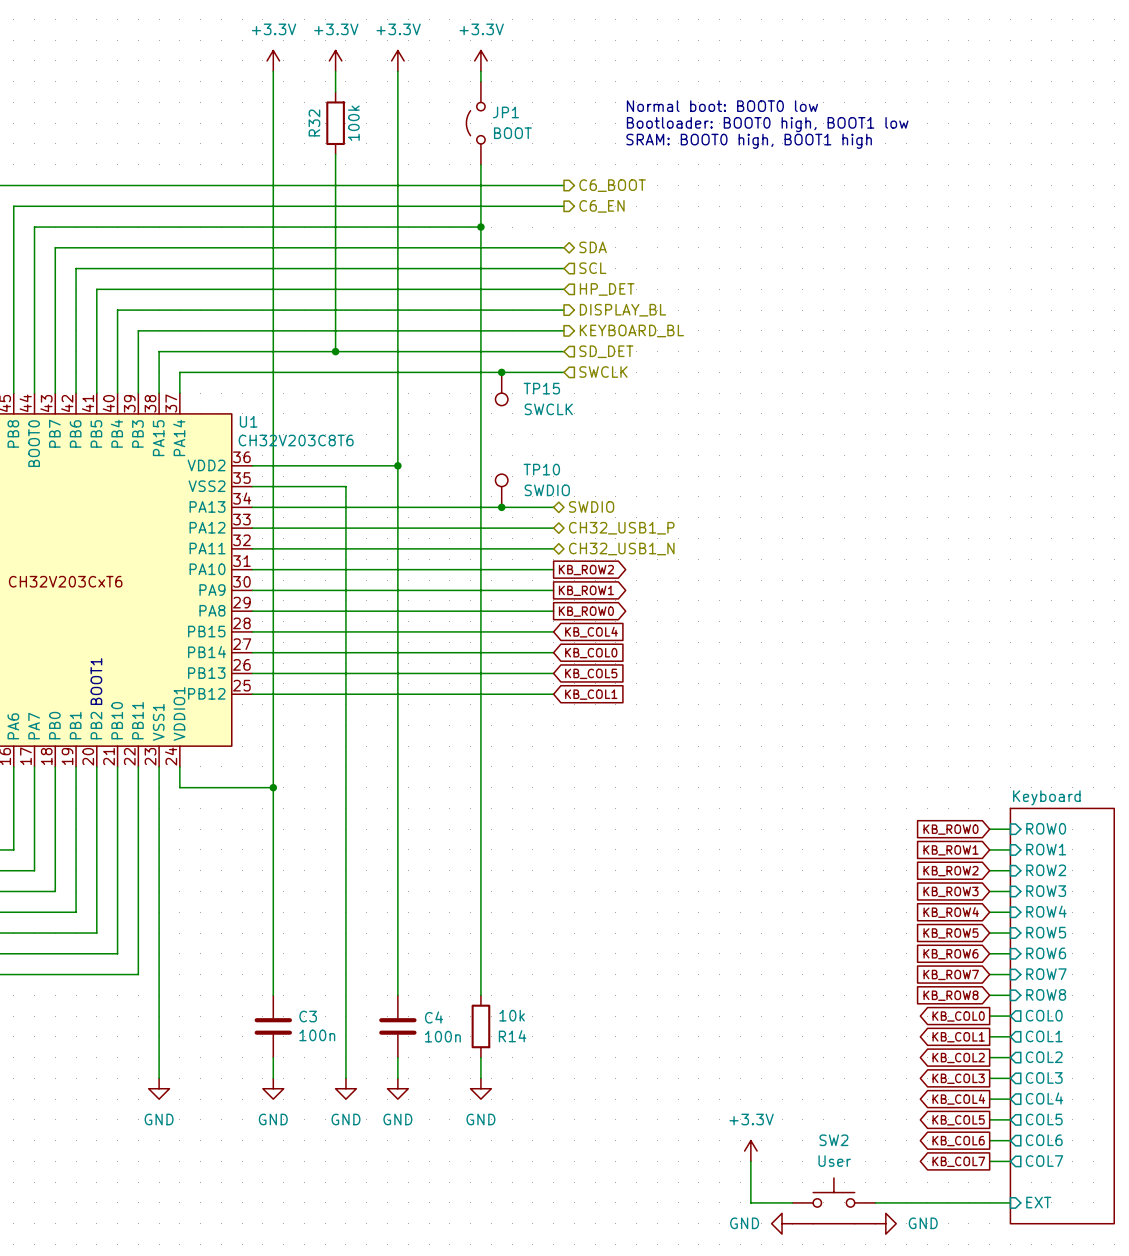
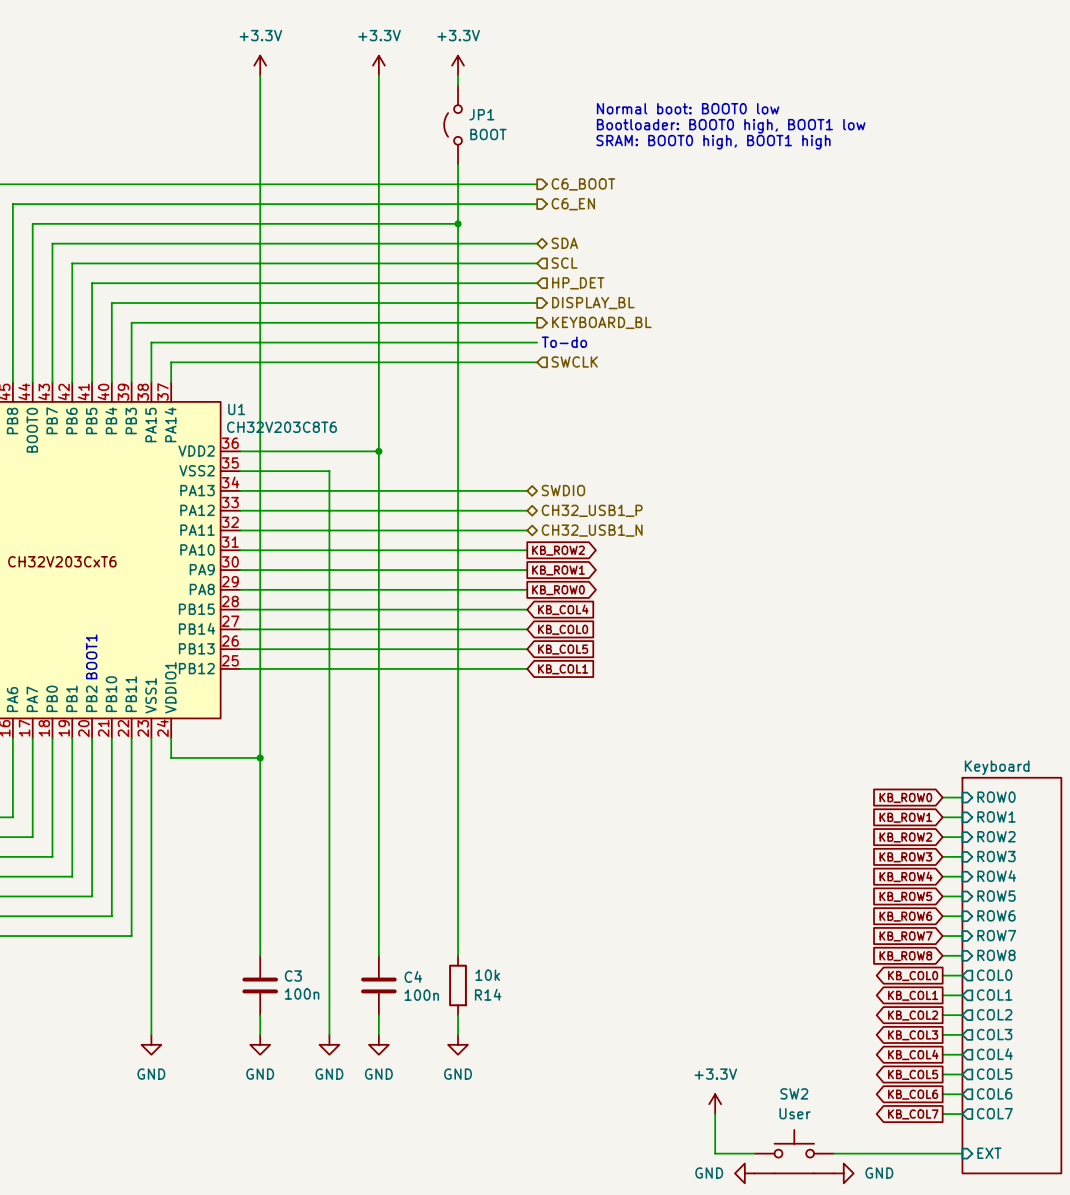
power symbol: +3.3V (335, 60) -> none
wire: (335, 71) (335, 92) -> none
R32: 100k (335, 123) -> none
wire: (335, 154) (335, 351) -> none
junction: (335, 351) -> none
text: none -> To-do (564, 342)
hierarchical label: SD_DET (606, 351) -> none
junction: (501, 372) -> none
TP15: SWCLK (501, 389) -> none
TP10: SWDIO (501, 490) -> none
junction: (501, 507) -> none

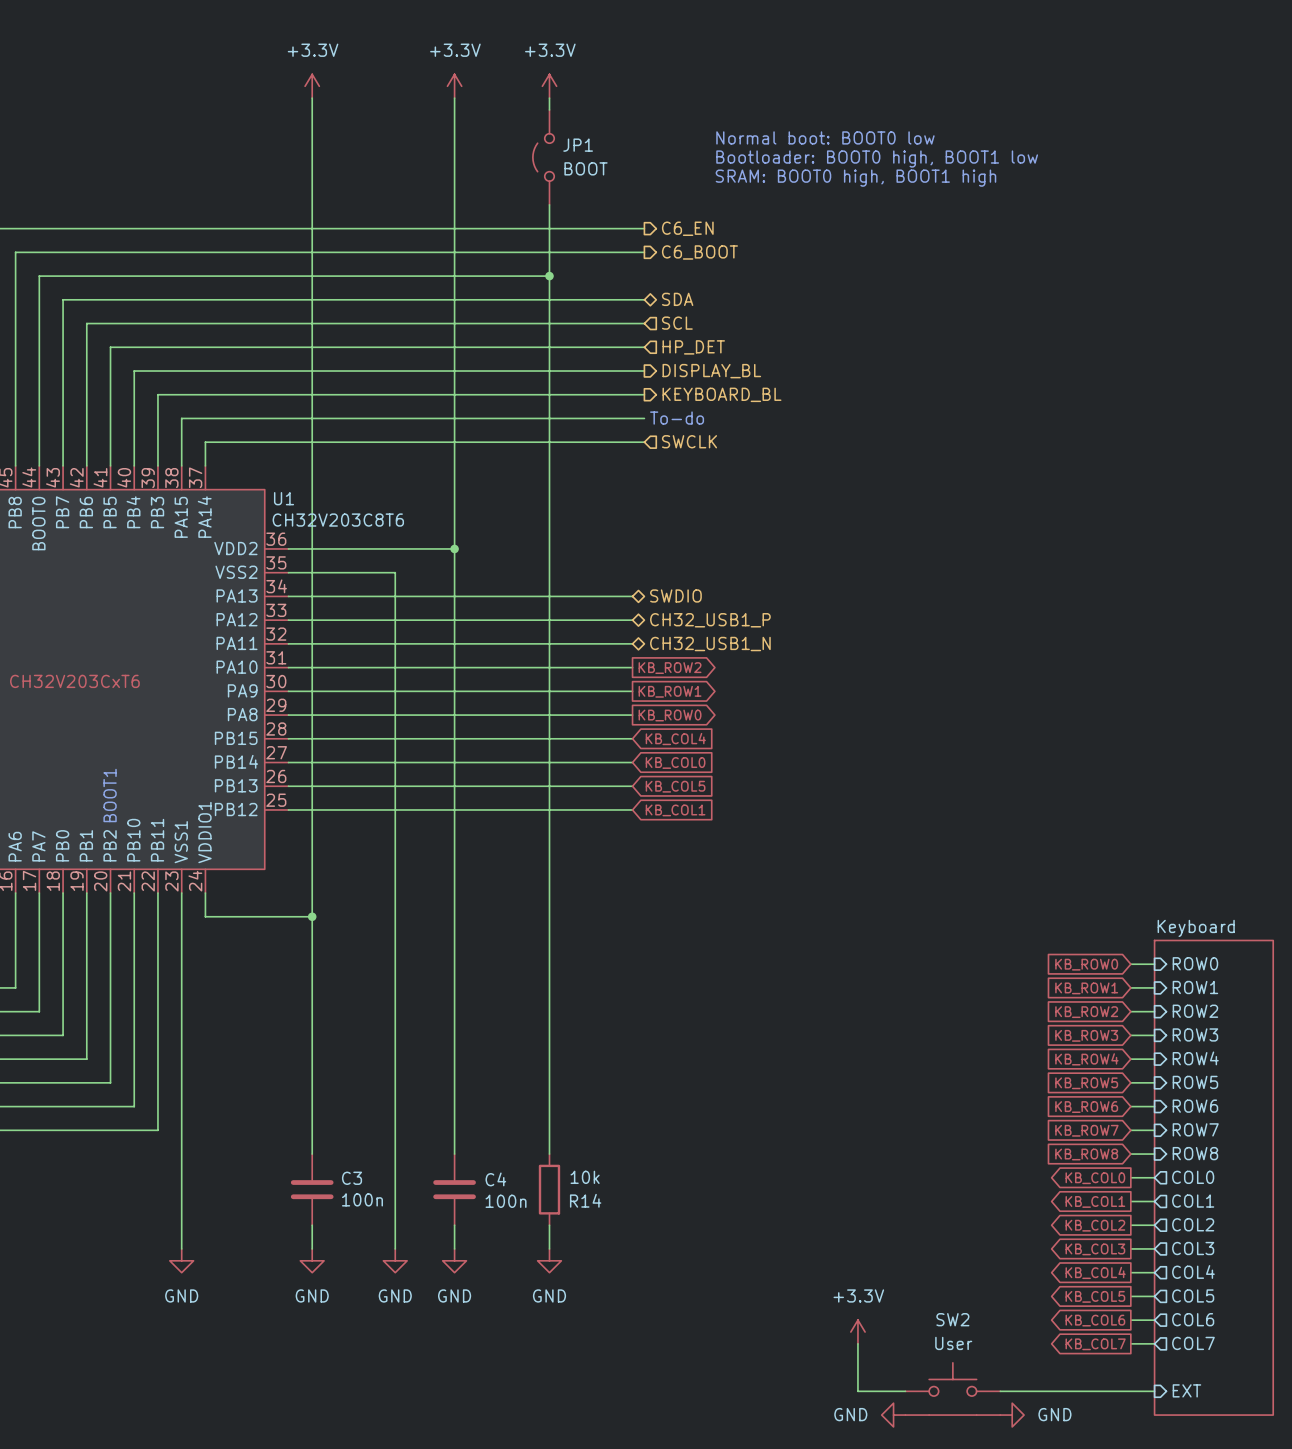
hierarchical label: C6_BOOT (583, 184) -> C6_EN (687, 228)
hierarchical label: C6_EN (573, 204) -> C6_BOOT (699, 252)

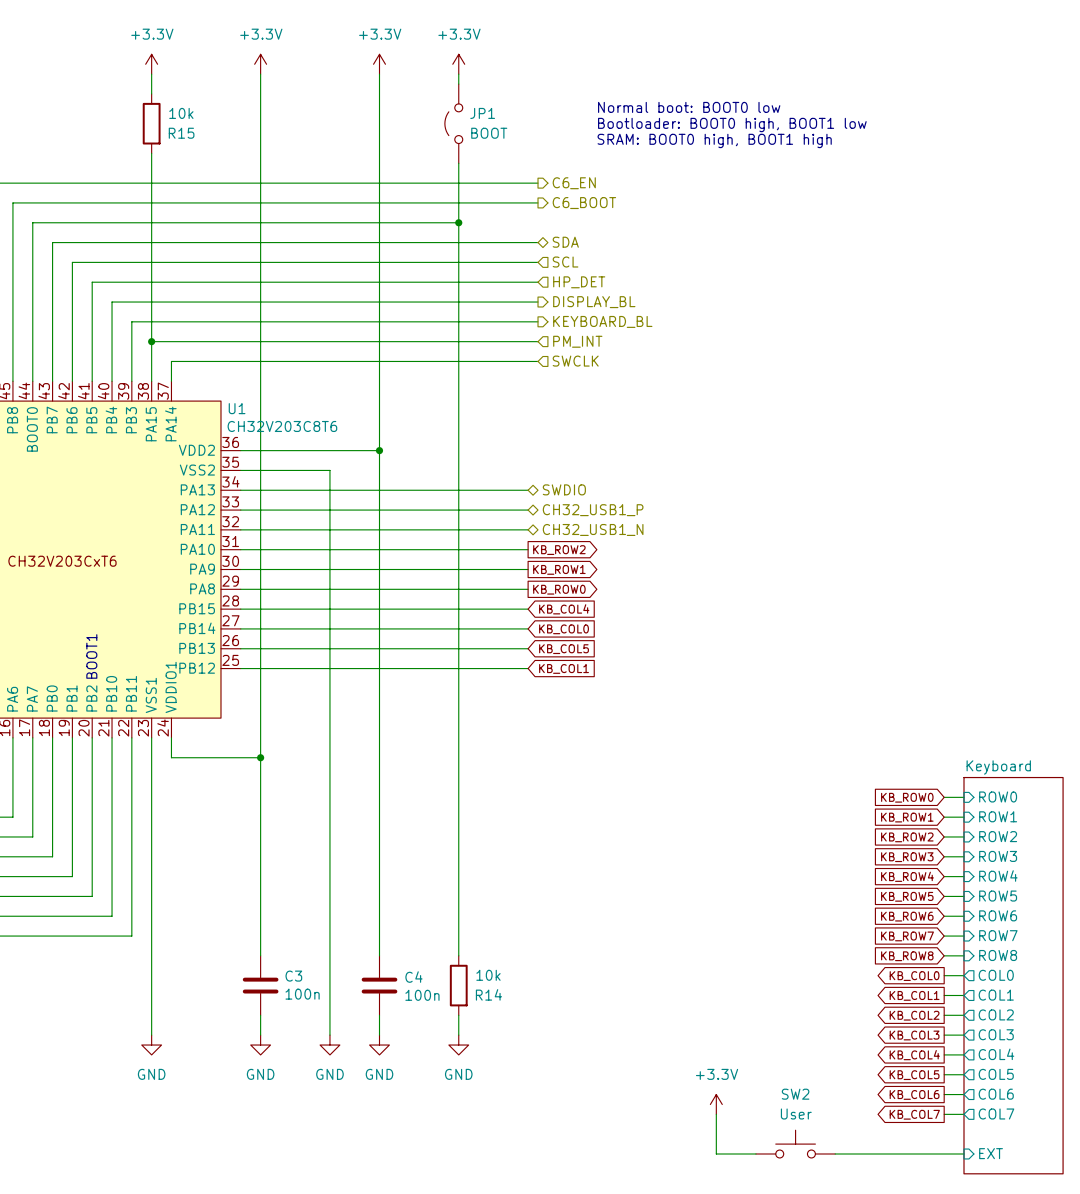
power symbol: none -> +3.3V (151, 64)
wire: none -> (151, 74) (151, 93)
R15: none -> 10k (151, 123)
wire: none -> (151, 153) (151, 341)
junction: none -> (151, 341)
text: To-do (677, 418) -> none
hierarchical label: none -> PM_INT (577, 341)
SW2 symbol: [905, 1362, 1001, 1416] -> [755, 1130, 836, 1158]
power symbol: GND (893, 1415) -> none
power symbol: GND (1012, 1415) -> none

